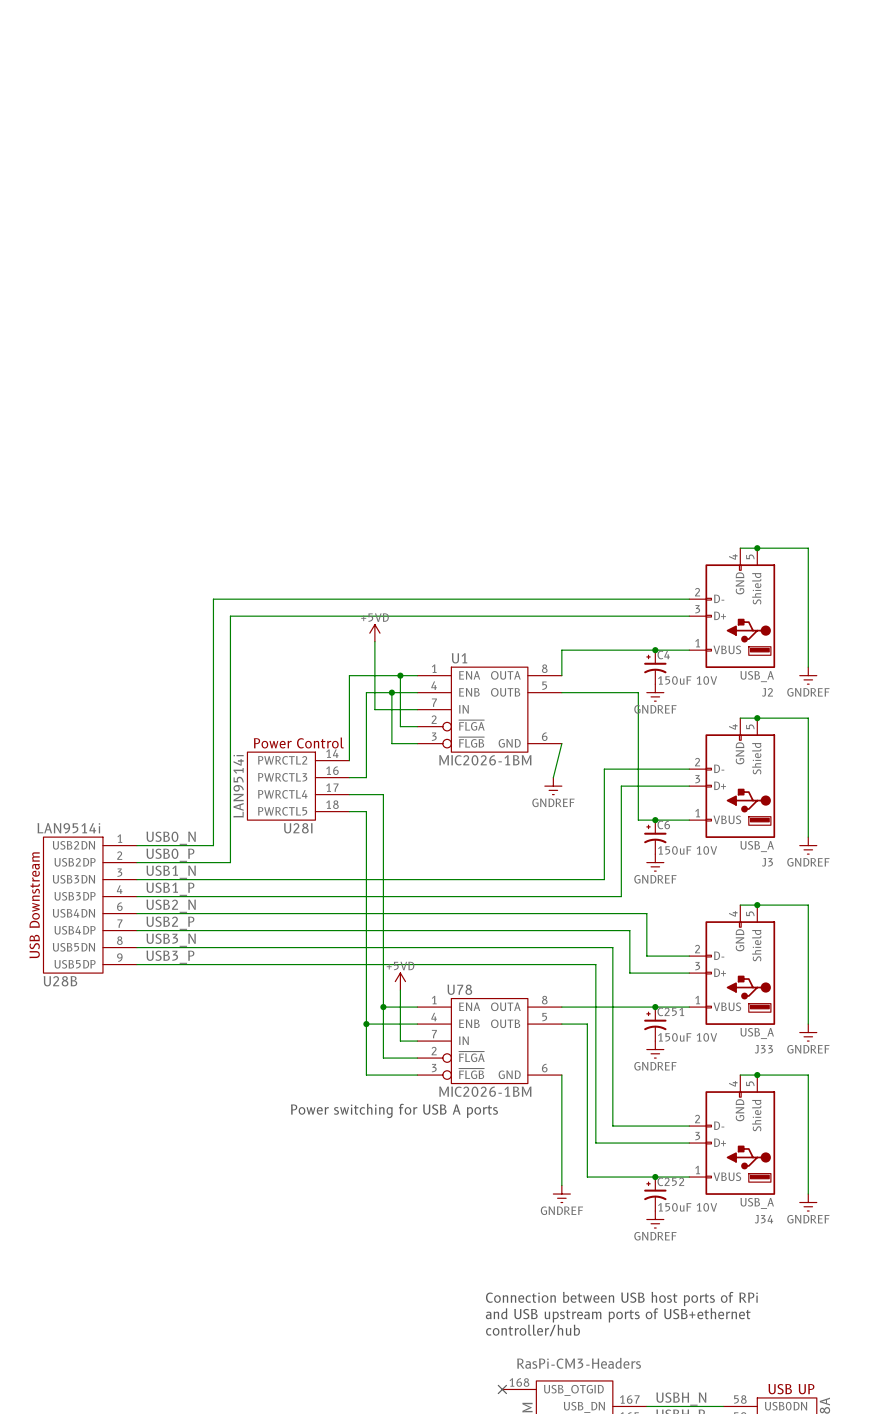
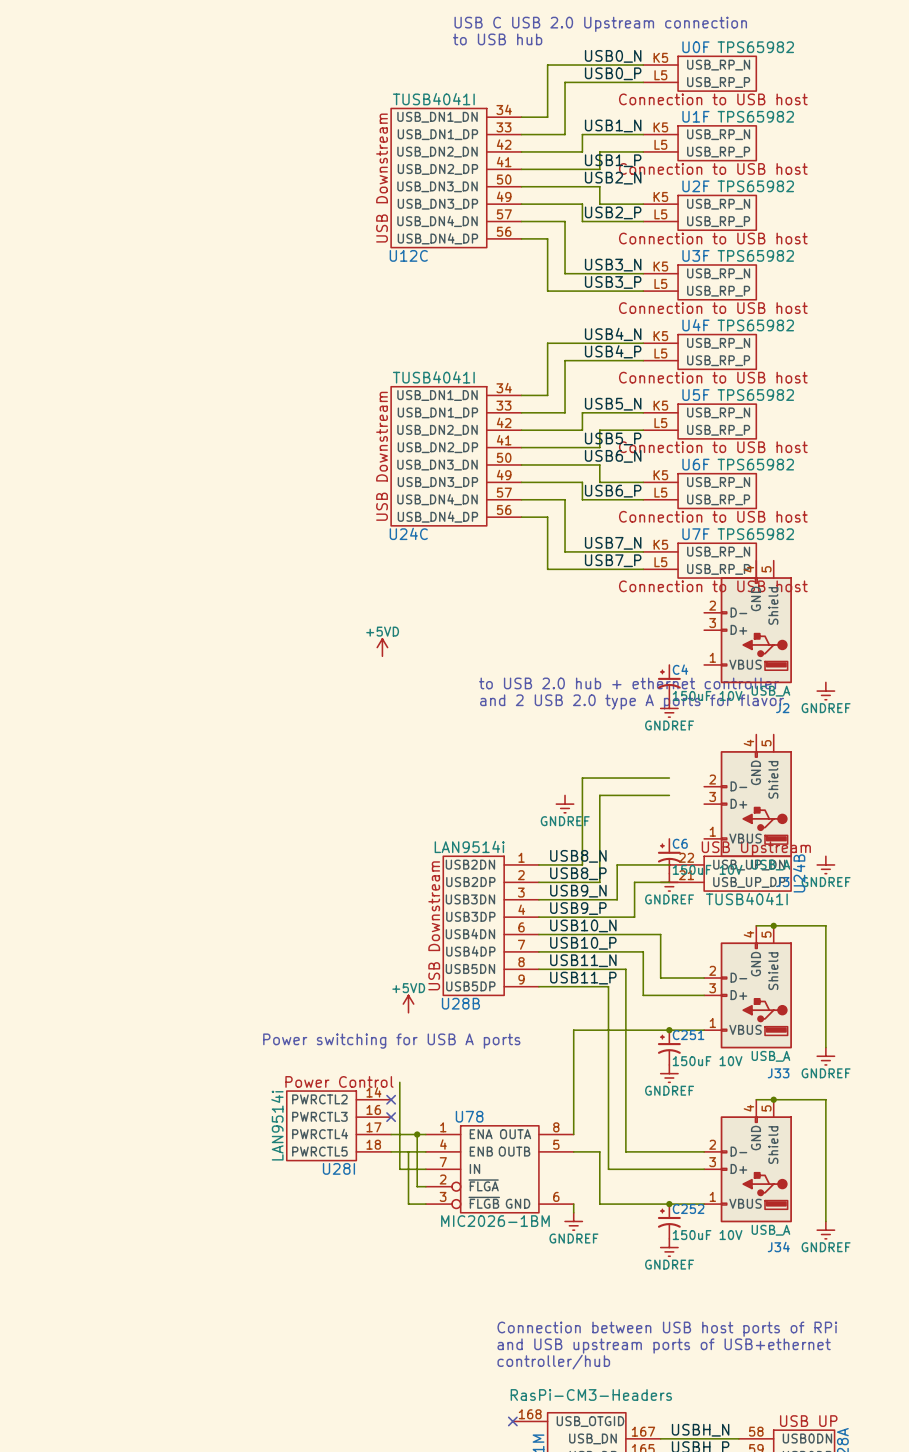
text: none -> USB C USB 2.0 Upstream connection (600, 24)
text: none -> to USB hub (497, 39)
label: none -> USB0_N (613, 56)
wire: none -> (643, 65) (547, 65) (547, 117) (521, 117)
U0F: none -> TPS65982 (699, 73)
label: none -> USB0_P (613, 73)
wire: none -> (643, 82) (565, 82) (565, 134) (521, 134)
label: none -> USB1_N (613, 125)
wire: none -> (643, 134) (582, 134) (582, 151) (521, 151)
U1F: none -> TPS65982 (699, 143)
wire: none -> (643, 151) (599, 151) (599, 169) (521, 169)
label: none -> USB1_P (613, 160)
U12C: none -> TUSB4041I (456, 178)
label: none -> USB2_N (613, 178)
wire: none -> (521, 186) (599, 186) (599, 204) (643, 204)
wire: none -> (521, 204) (582, 204) (582, 221) (643, 221)
U2F: none -> TPS65982 (699, 212)
label: none -> USB2_P (613, 212)
wire: none -> (521, 221) (565, 221) (565, 273) (643, 273)
wire: none -> (521, 238) (547, 238) (547, 291) (643, 291)
label: none -> USB3_N (613, 265)
U3F: none -> TPS65982 (699, 282)
label: none -> USB3_P (613, 282)
label: none -> USB4_N (613, 334)
wire: none -> (643, 343) (547, 343) (547, 395) (521, 395)
U4F: none -> TPS65982 (699, 351)
label: none -> USB4_P (613, 351)
wire: none -> (643, 360) (565, 360) (565, 412) (521, 412)
label: none -> USB5_N (613, 404)
wire: none -> (643, 412) (582, 412) (582, 430) (521, 430)
U5F: none -> TPS65982 (699, 421)
wire: none -> (643, 430) (599, 430) (599, 447) (521, 447)
label: none -> USB5_P (613, 438)
U24C: none -> TUSB4041I (456, 456)
label: none -> USB6_N (613, 456)
wire: none -> (521, 464) (599, 464) (599, 482) (643, 482)
wire: none -> (521, 482) (582, 482) (582, 499) (643, 499)
U6F: none -> TPS65982 (699, 491)
label: none -> USB6_P (613, 491)
wire: none -> (521, 499) (565, 499) (565, 551) (643, 551)
wire: none -> (521, 517) (547, 517) (547, 569) (643, 569)
label: none -> USB7_N (613, 543)
U7F: none -> TPS65982 (699, 560)
wire: (740, 548) (808, 548) (808, 667) -> none
junction: (757, 548) -> none
label: none -> USB7_P (613, 560)
wire: (689, 599) (213, 599) (213, 845) (136, 845) -> none
wire: (689, 616) (230, 616) (230, 862) (136, 862) -> none
wire: (374, 641) (374, 709) (417, 709) -> none
junction: (655, 650) -> none
wire: (689, 650) (561, 650) (561, 675) -> none
text: none -> to USB 2.0 hub + ethernet controller (629, 683)
wire: (400, 675) (400, 726) (417, 726) -> none
junction: (400, 675) -> none
wire: (417, 675) (349, 675) (349, 760) -> none
text: none -> and 2 USB 2.0 type A ports for flavor (632, 701)
wire: (391, 692) (391, 743) (417, 743) -> none
junction: (391, 692) -> none
wire: (417, 692) (366, 692) (366, 777) (349, 777) -> none
wire: (561, 692) (638, 692) (638, 820) (689, 820) -> none
U1: MIC2026-1BM (489, 709) -> none
wire: (740, 718) (808, 718) (808, 837) -> none
junction: (757, 718) -> none
wire: (561, 743) (553, 777) -> none
wire: none -> (669, 778) (582, 778) (582, 864) (538, 864)
wire: (689, 769) (604, 769) (604, 845) -> (669, 864) (617, 864)
wire: none -> (669, 795) (599, 795) (599, 882) (538, 882)
U28I position: (298, 786) -> (338, 1125)
wire: (689, 786) (621, 786) (621, 862) -> (669, 882) (634, 882)
wire: (349, 794) (383, 794) (383, 1058) (417, 1058) -> none
wire: (349, 811) (366, 811) (366, 1075) (417, 1075) -> none
junction: (655, 820) -> none
label: USB0_N (171, 838) -> none
label: none -> USB8_N (578, 856)
U24B: none -> TUSB4041I (730, 873)
label: USB0_P (170, 855) -> none
label: none -> USB8_P (578, 873)
label: USB1_N (171, 872) -> none
label: none -> USB9_N (578, 891)
wire: (136, 879) (527, 879) -> none
label: USB1_P (170, 889) -> none
label: none -> USB9_P (578, 908)
wire: (136, 896) (527, 896) -> none
U28B position: (90, 905) -> (491, 925)
label: USB2_N (171, 906) -> none
label: none -> USB10_N (583, 925)
wire: (136, 913) (527, 913) -> none
label: USB2_P (170, 923) -> none
label: none -> USB10_P (583, 943)
wire: (136, 930) (527, 930) -> none
label: USB3_N (171, 940) -> none
label: none -> USB11_N (583, 960)
wire: (136, 947) (527, 947) -> none
label: USB3_P (170, 957) -> none
label: none -> USB11_P (583, 978)
wire: (136, 964) (527, 964) -> none
wire: (400, 990) (400, 1041) (417, 1041) -> (408, 1151) (408, 1204) (425, 1204)
wire: (383, 1007) (417, 1007) -> (391, 1134) (425, 1134)
junction: (383, 1007) -> none
wire: (366, 1024) (417, 1024) -> none
junction: (366, 1024) -> none
wire: (561, 1024) (587, 1024) (587, 1126) -> (573, 1151) (599, 1151)
U78 position: (489, 1041) -> (499, 1169)
wire: none -> (399, 1082) (399, 1169) (425, 1169)
no-connect mark: none -> (391, 1099)
no-connect mark: none -> (391, 1117)
wire: none -> (417, 1134) (417, 1186) (425, 1186)
junction: none -> (417, 1134)
wire: (561, 1109) (561, 1177) -> (573, 1030) (573, 1099)
text position: Power switching for USB A ports (394, 1110) -> Power switching for USB A ports (391, 1041)
wire: none -> (391, 1151) (425, 1151)

